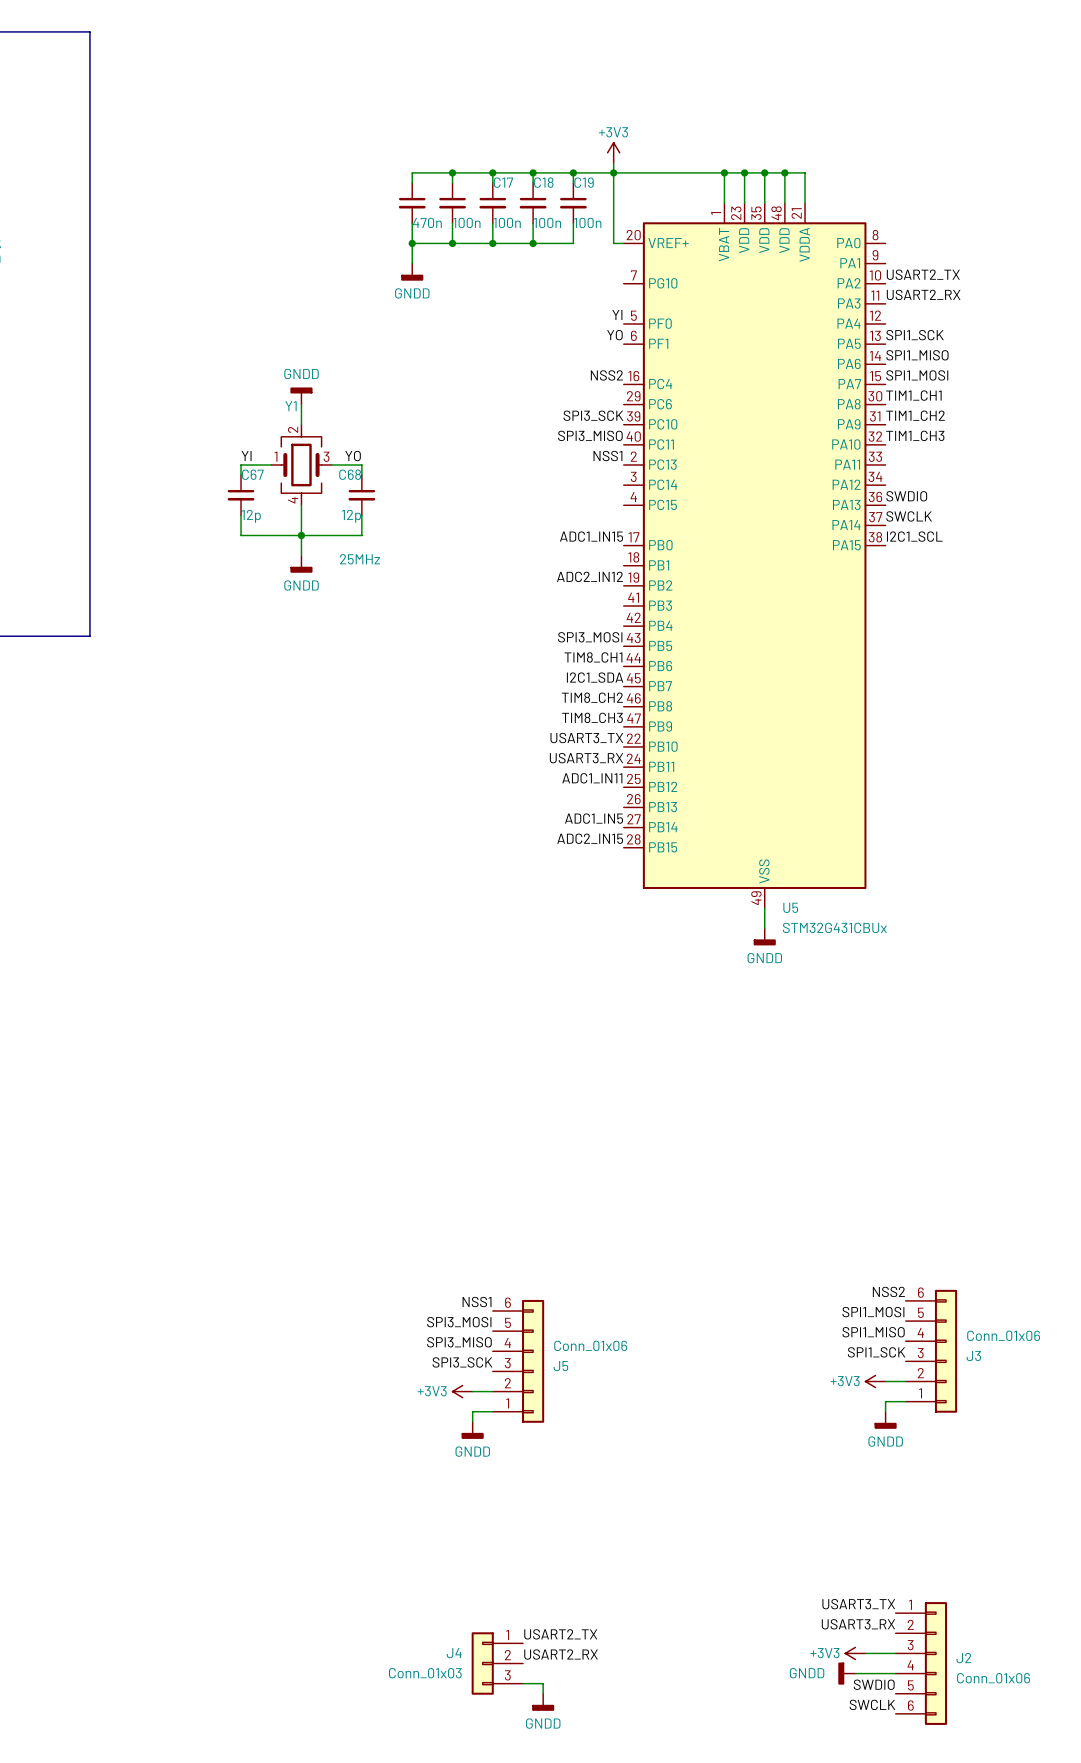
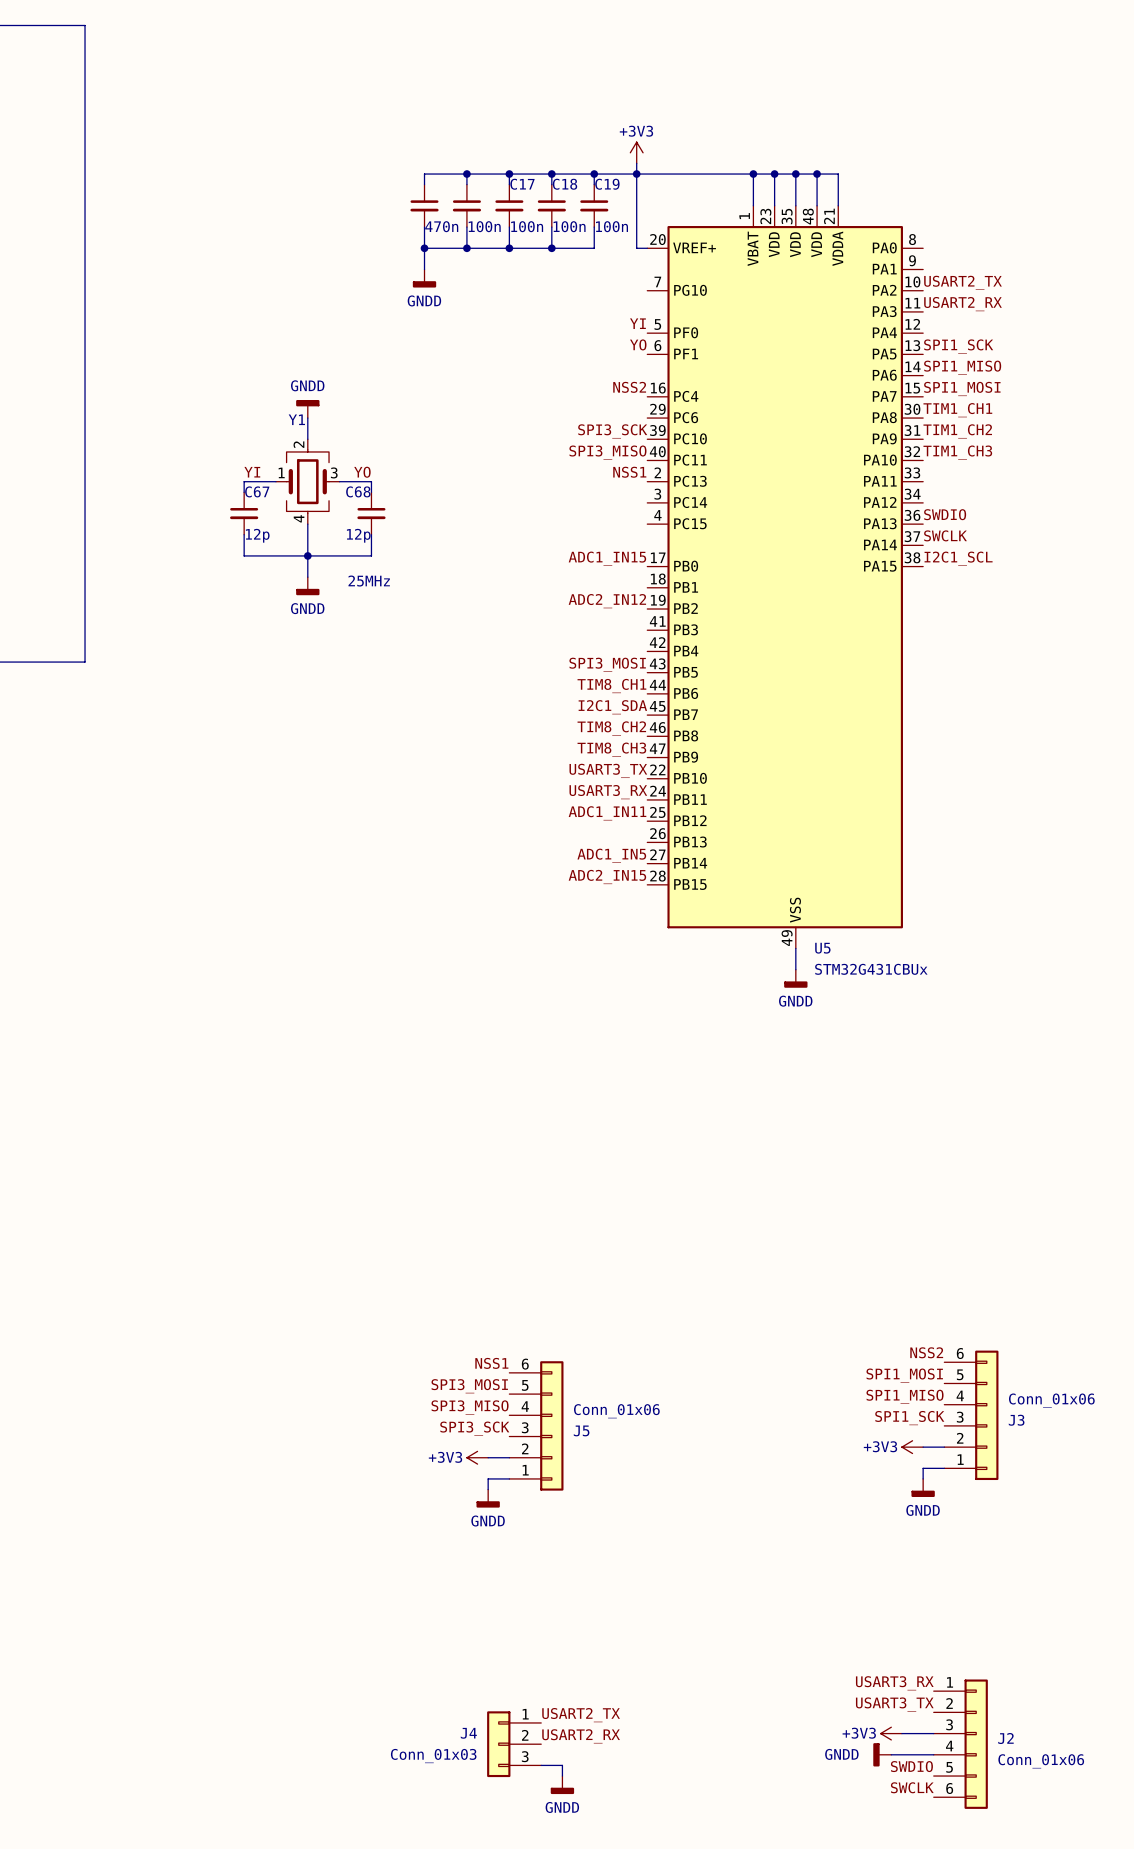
label: USART3_TX (858, 1604) -> USART3_RX (894, 1683)
label: USART3_RX (858, 1624) -> USART3_TX (894, 1704)

